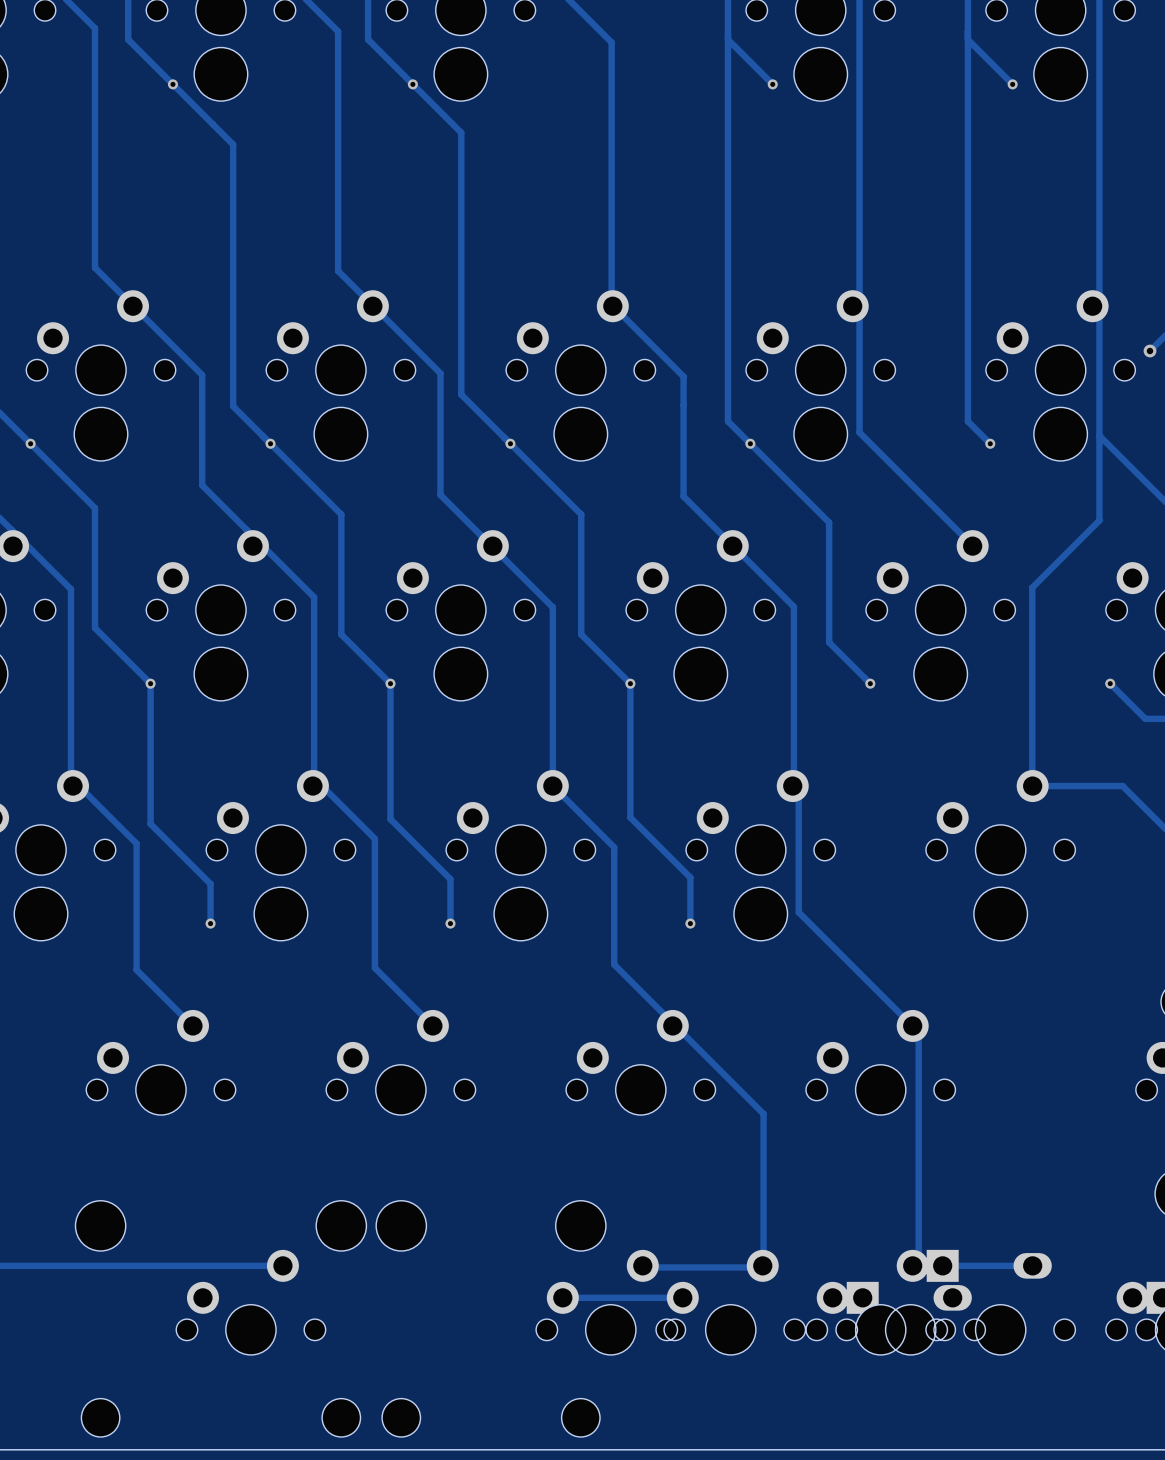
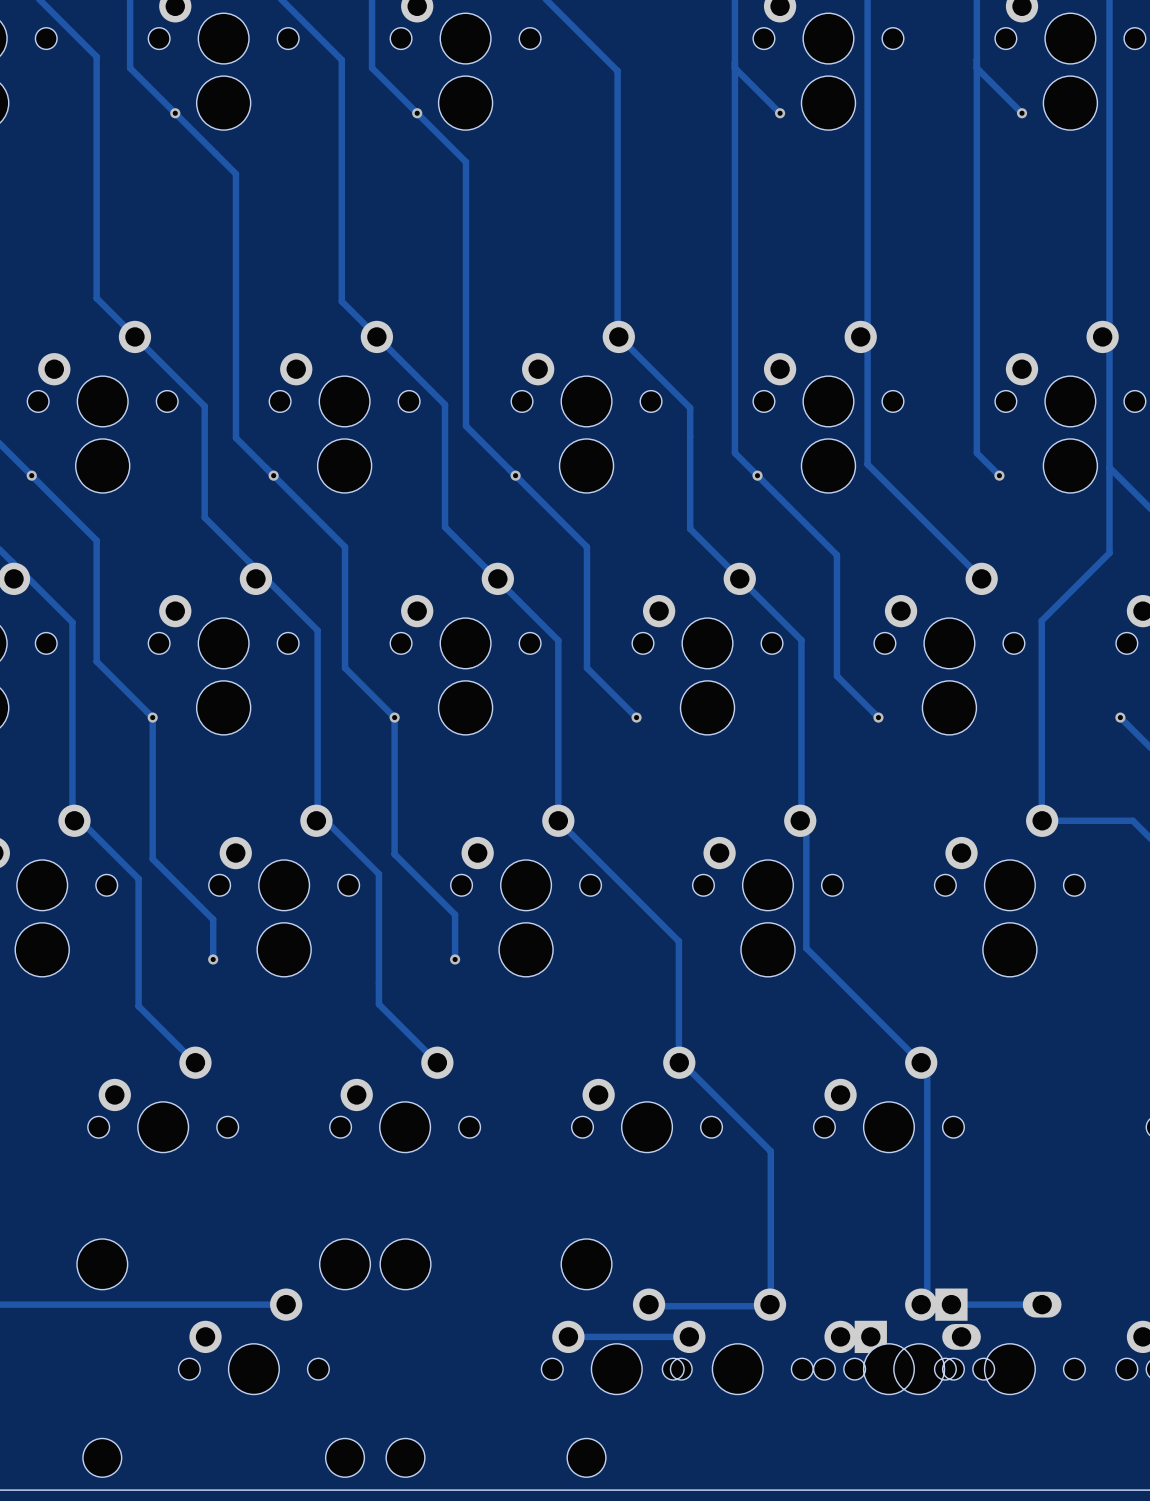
track: (630, 683) (630, 817) (690, 877) (690, 923) -> none
track: (614, 847) (614, 964) (672, 1022) -> (620, 882) (678, 941) (678, 1059)
via: (690, 923) -> none

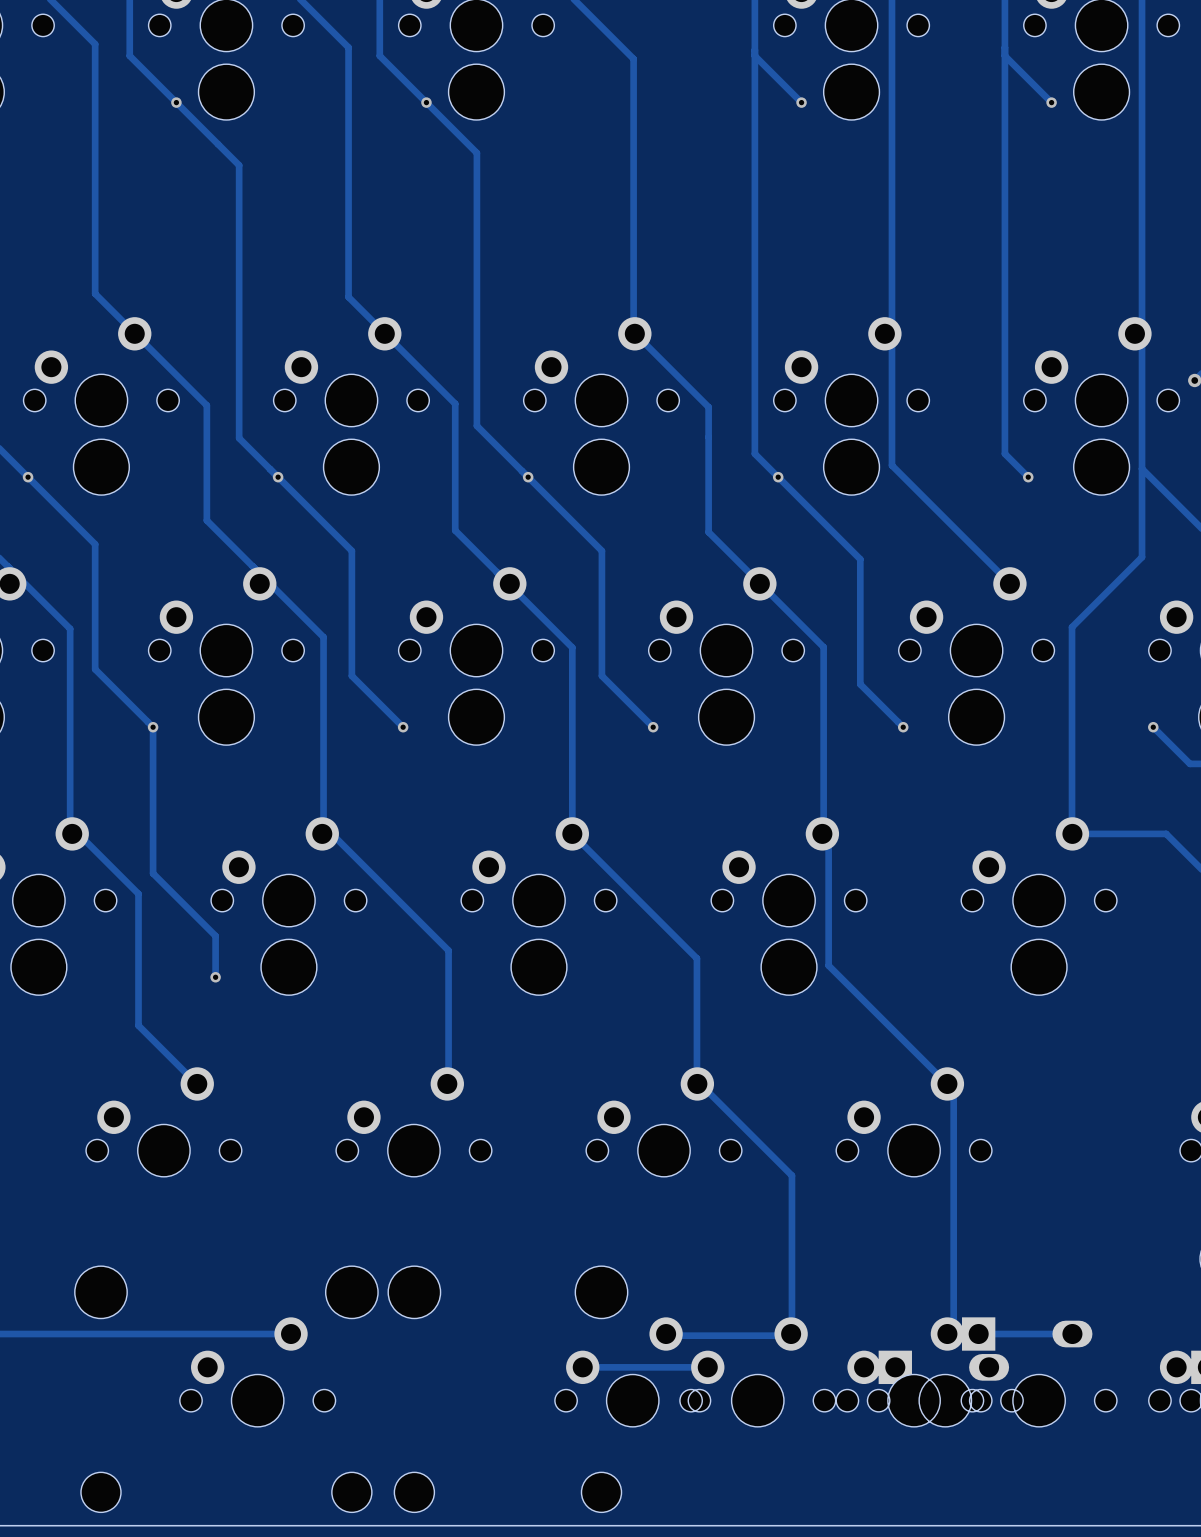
track: (394, 717) (394, 854) (455, 914) (455, 959) -> none
track: (378, 874) (378, 1004) (437, 1062) -> (386, 888) (448, 950) (448, 1082)
via: (455, 959) -> none

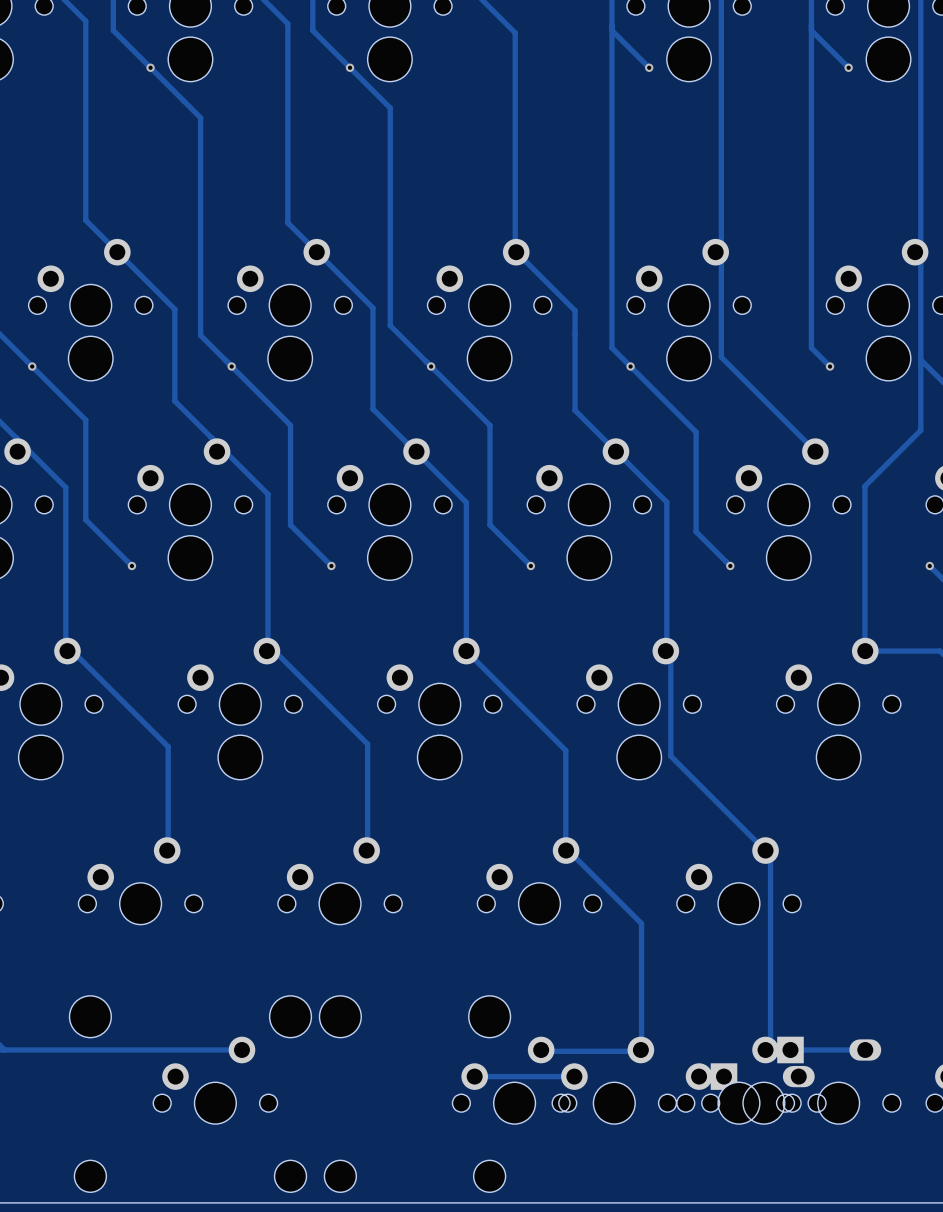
track: (153, 727) (153, 873) (215, 936) (215, 977) -> none
track: (138, 893) (138, 1025) (196, 1083) -> (120, 698) (168, 746) (168, 849)
via: (215, 977) -> none

